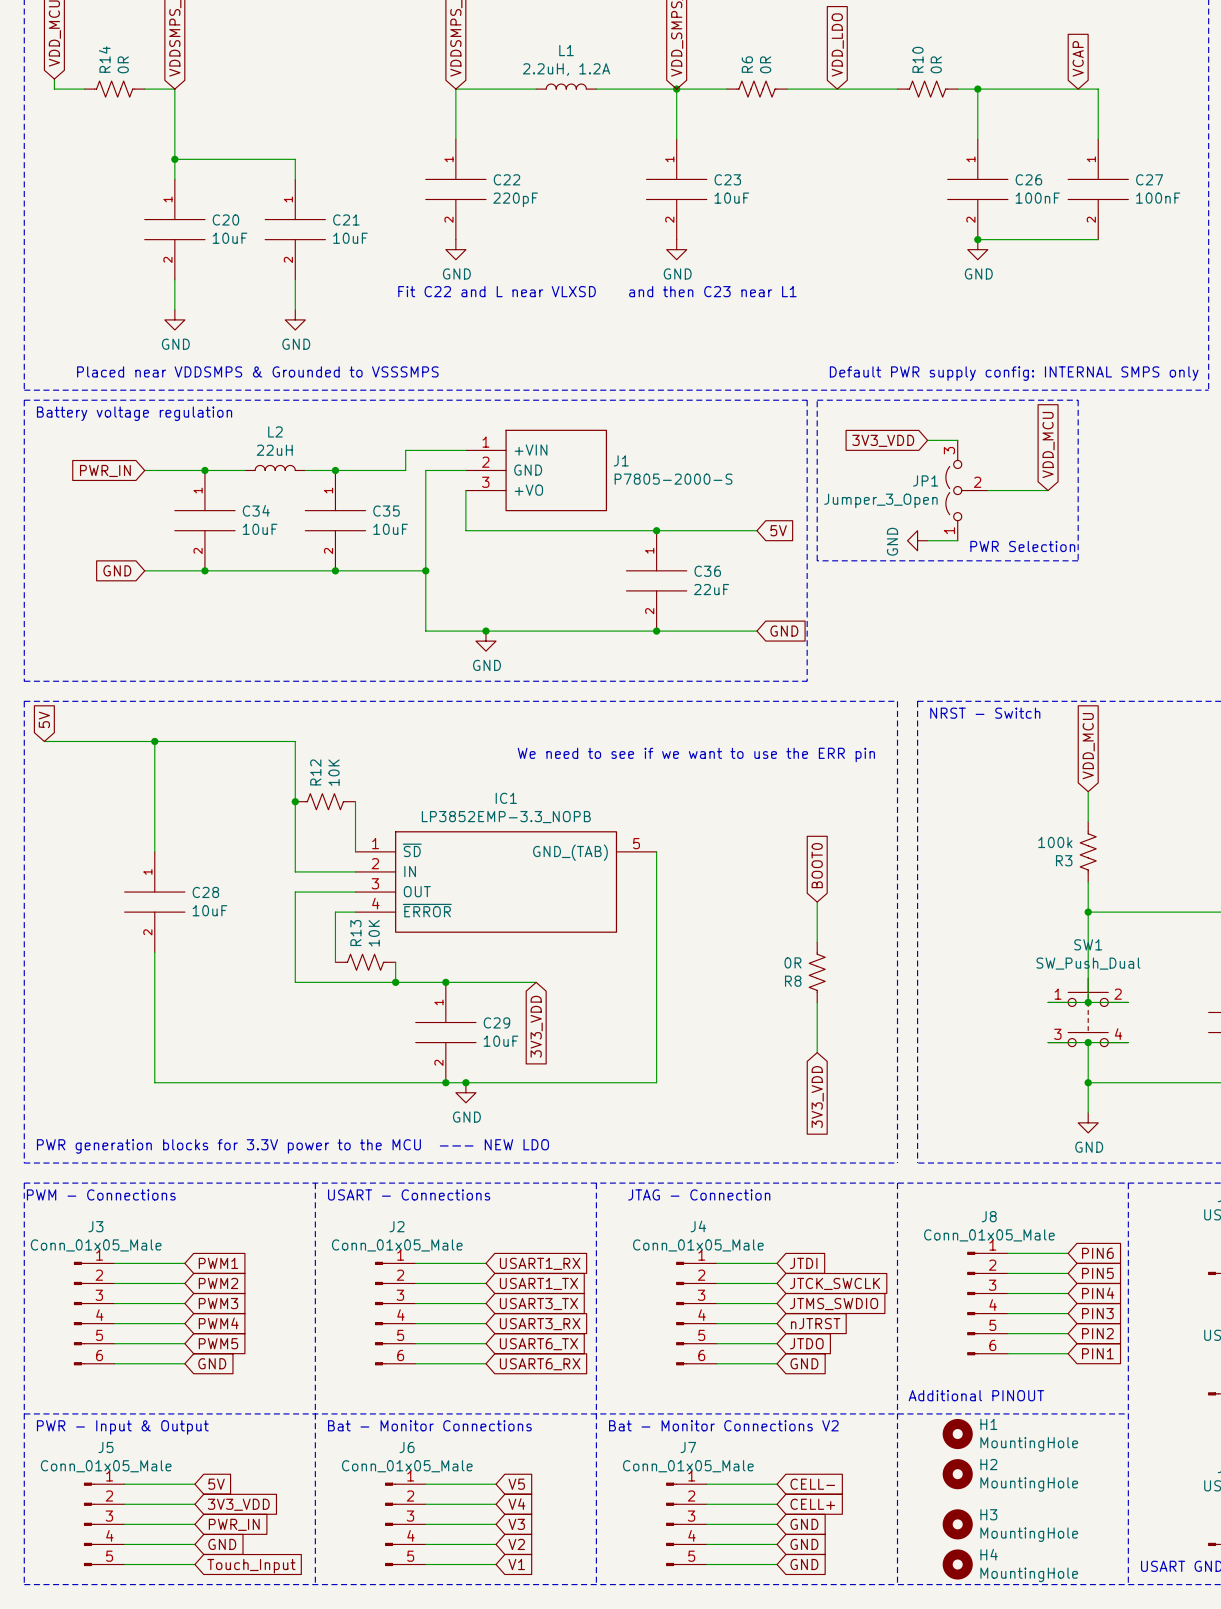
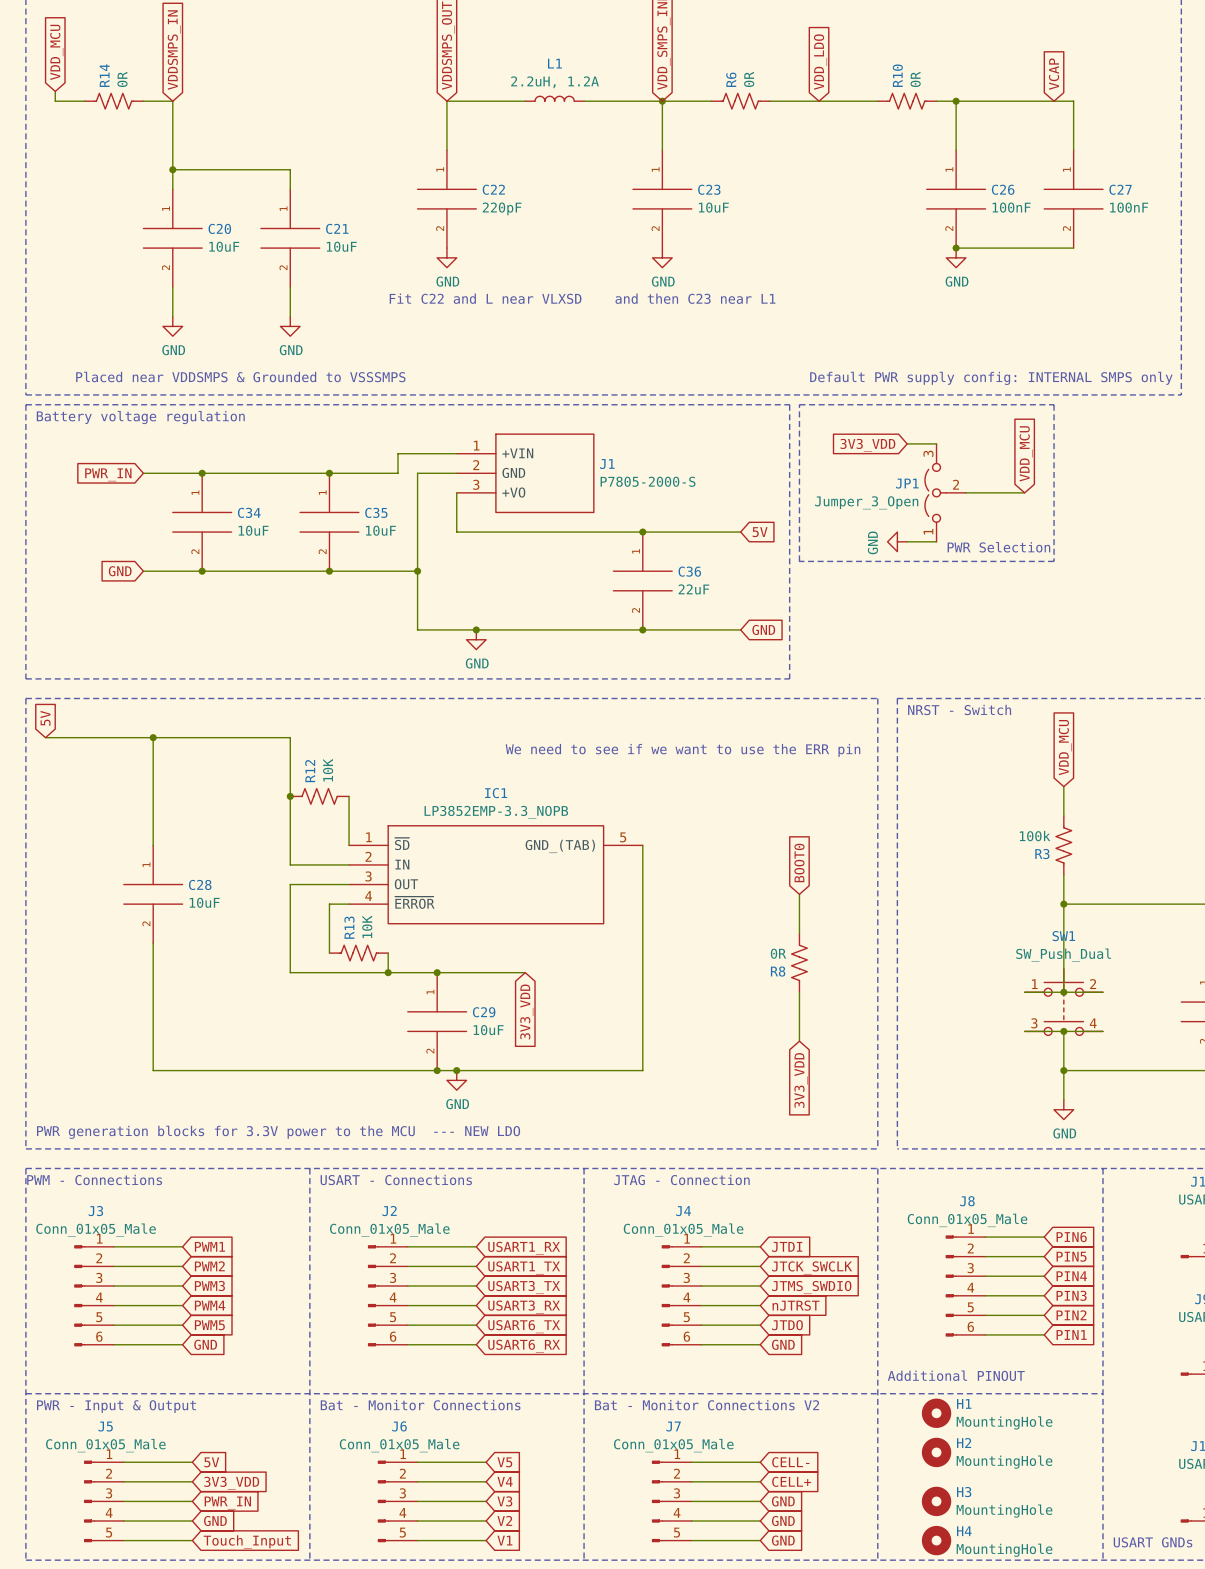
L2: 22uH (275, 467) -> none
wire: none -> (241, 473) (300, 473)

